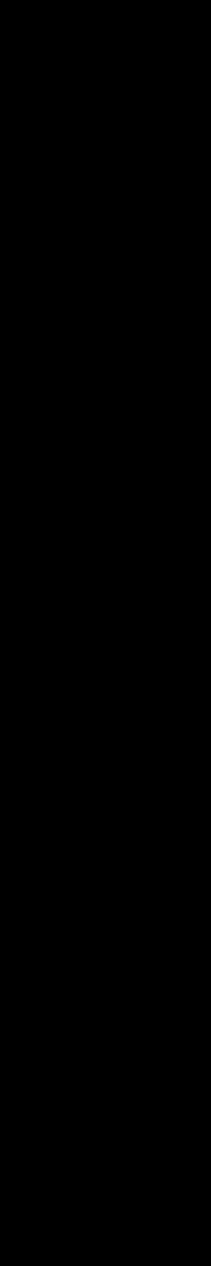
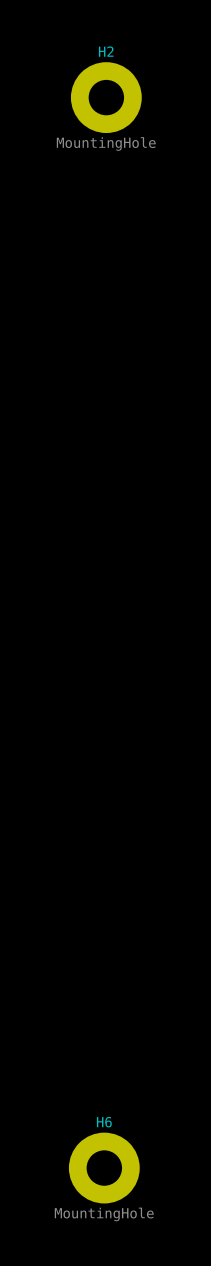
H2: none -> MountingHole (106, 97)
H6: none -> MountingHole (104, 1168)

